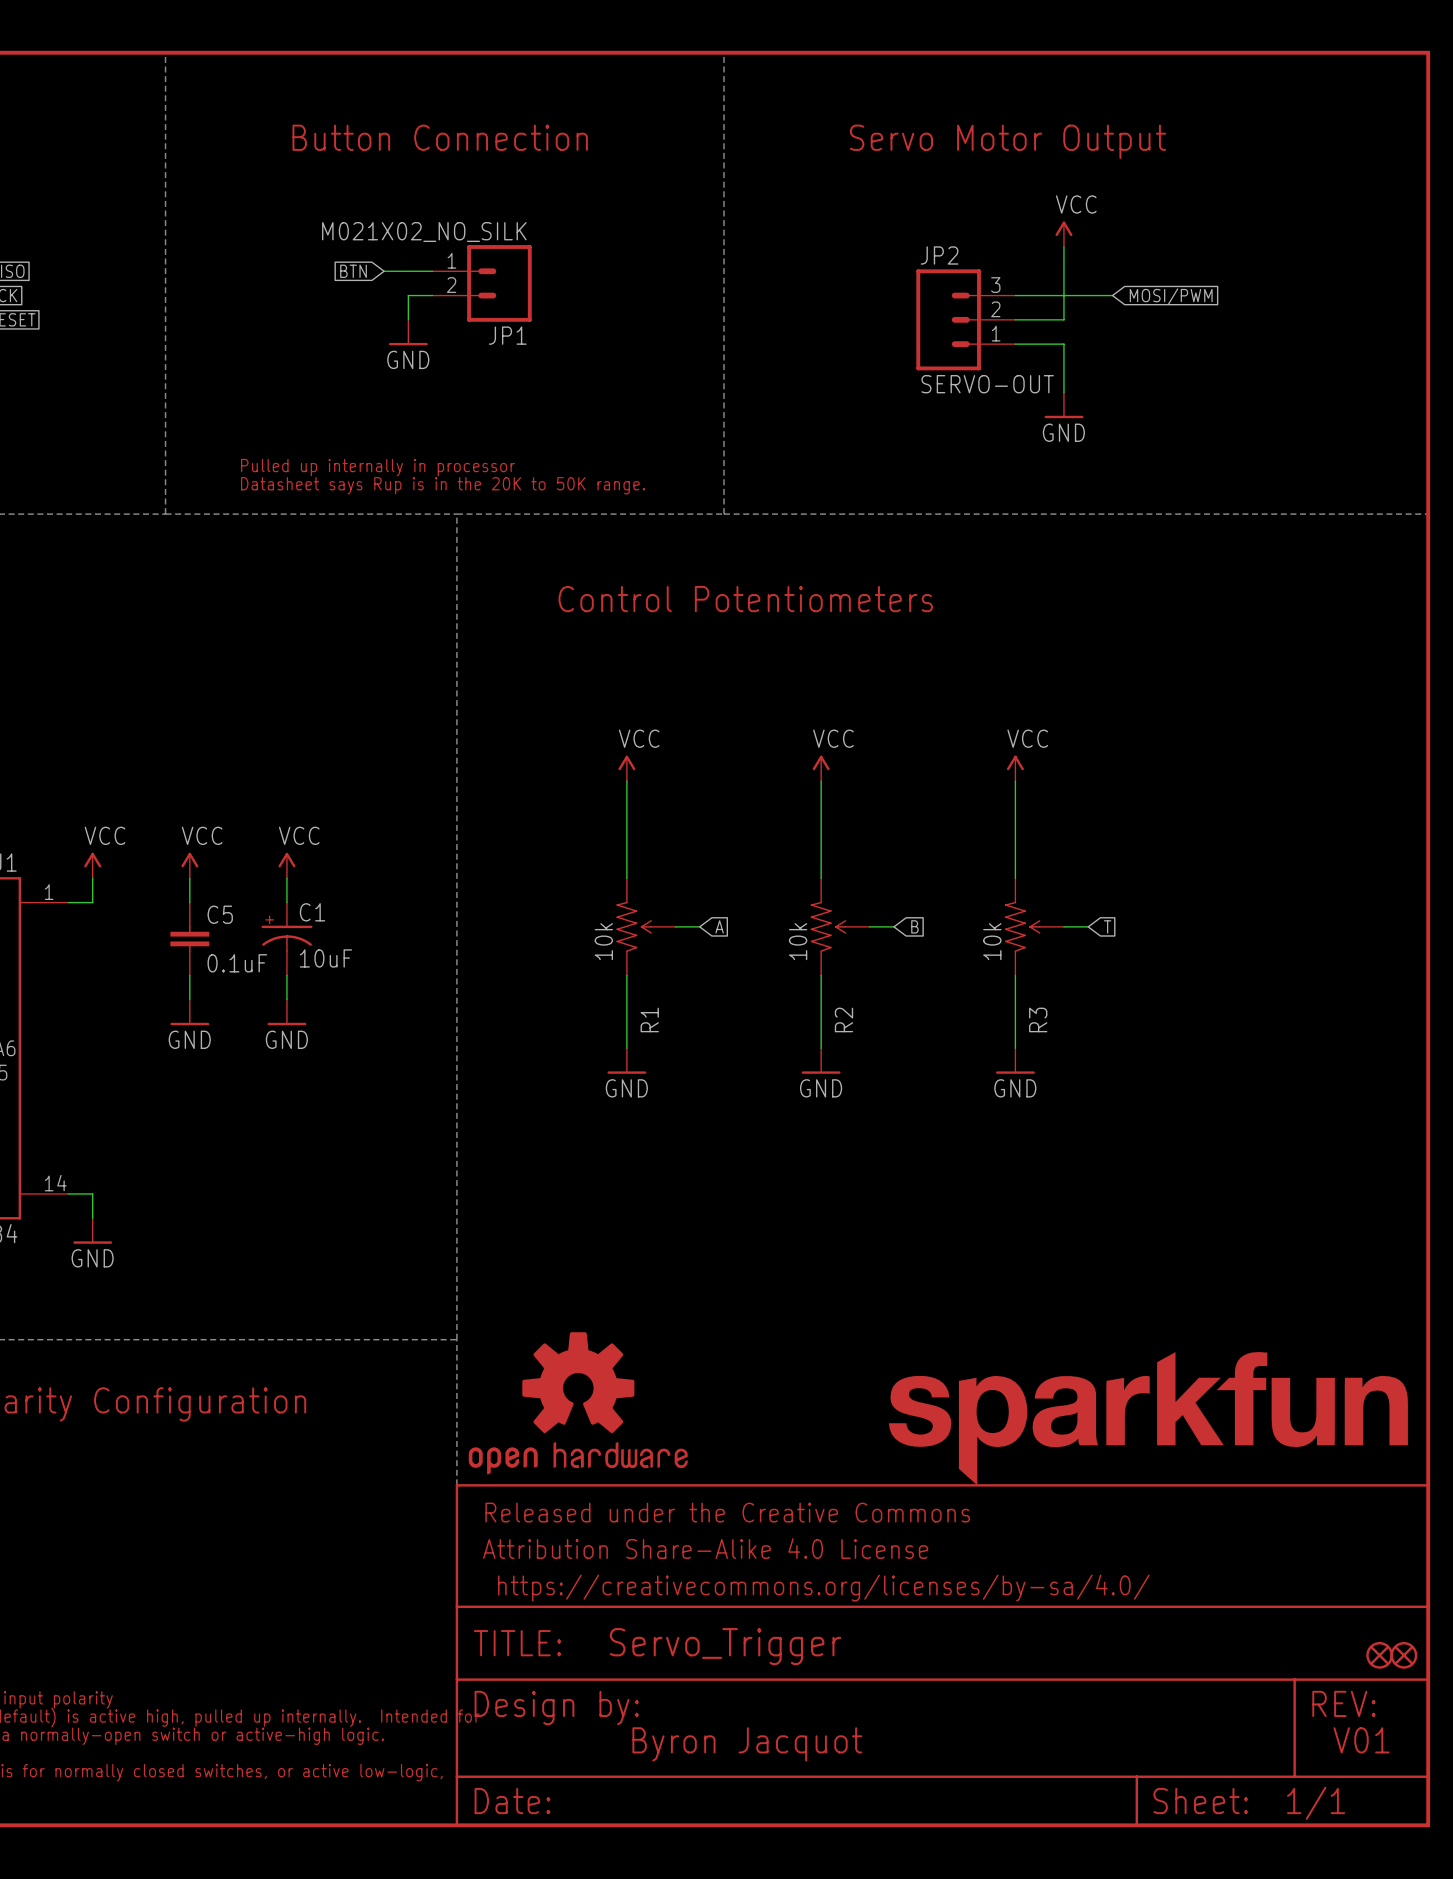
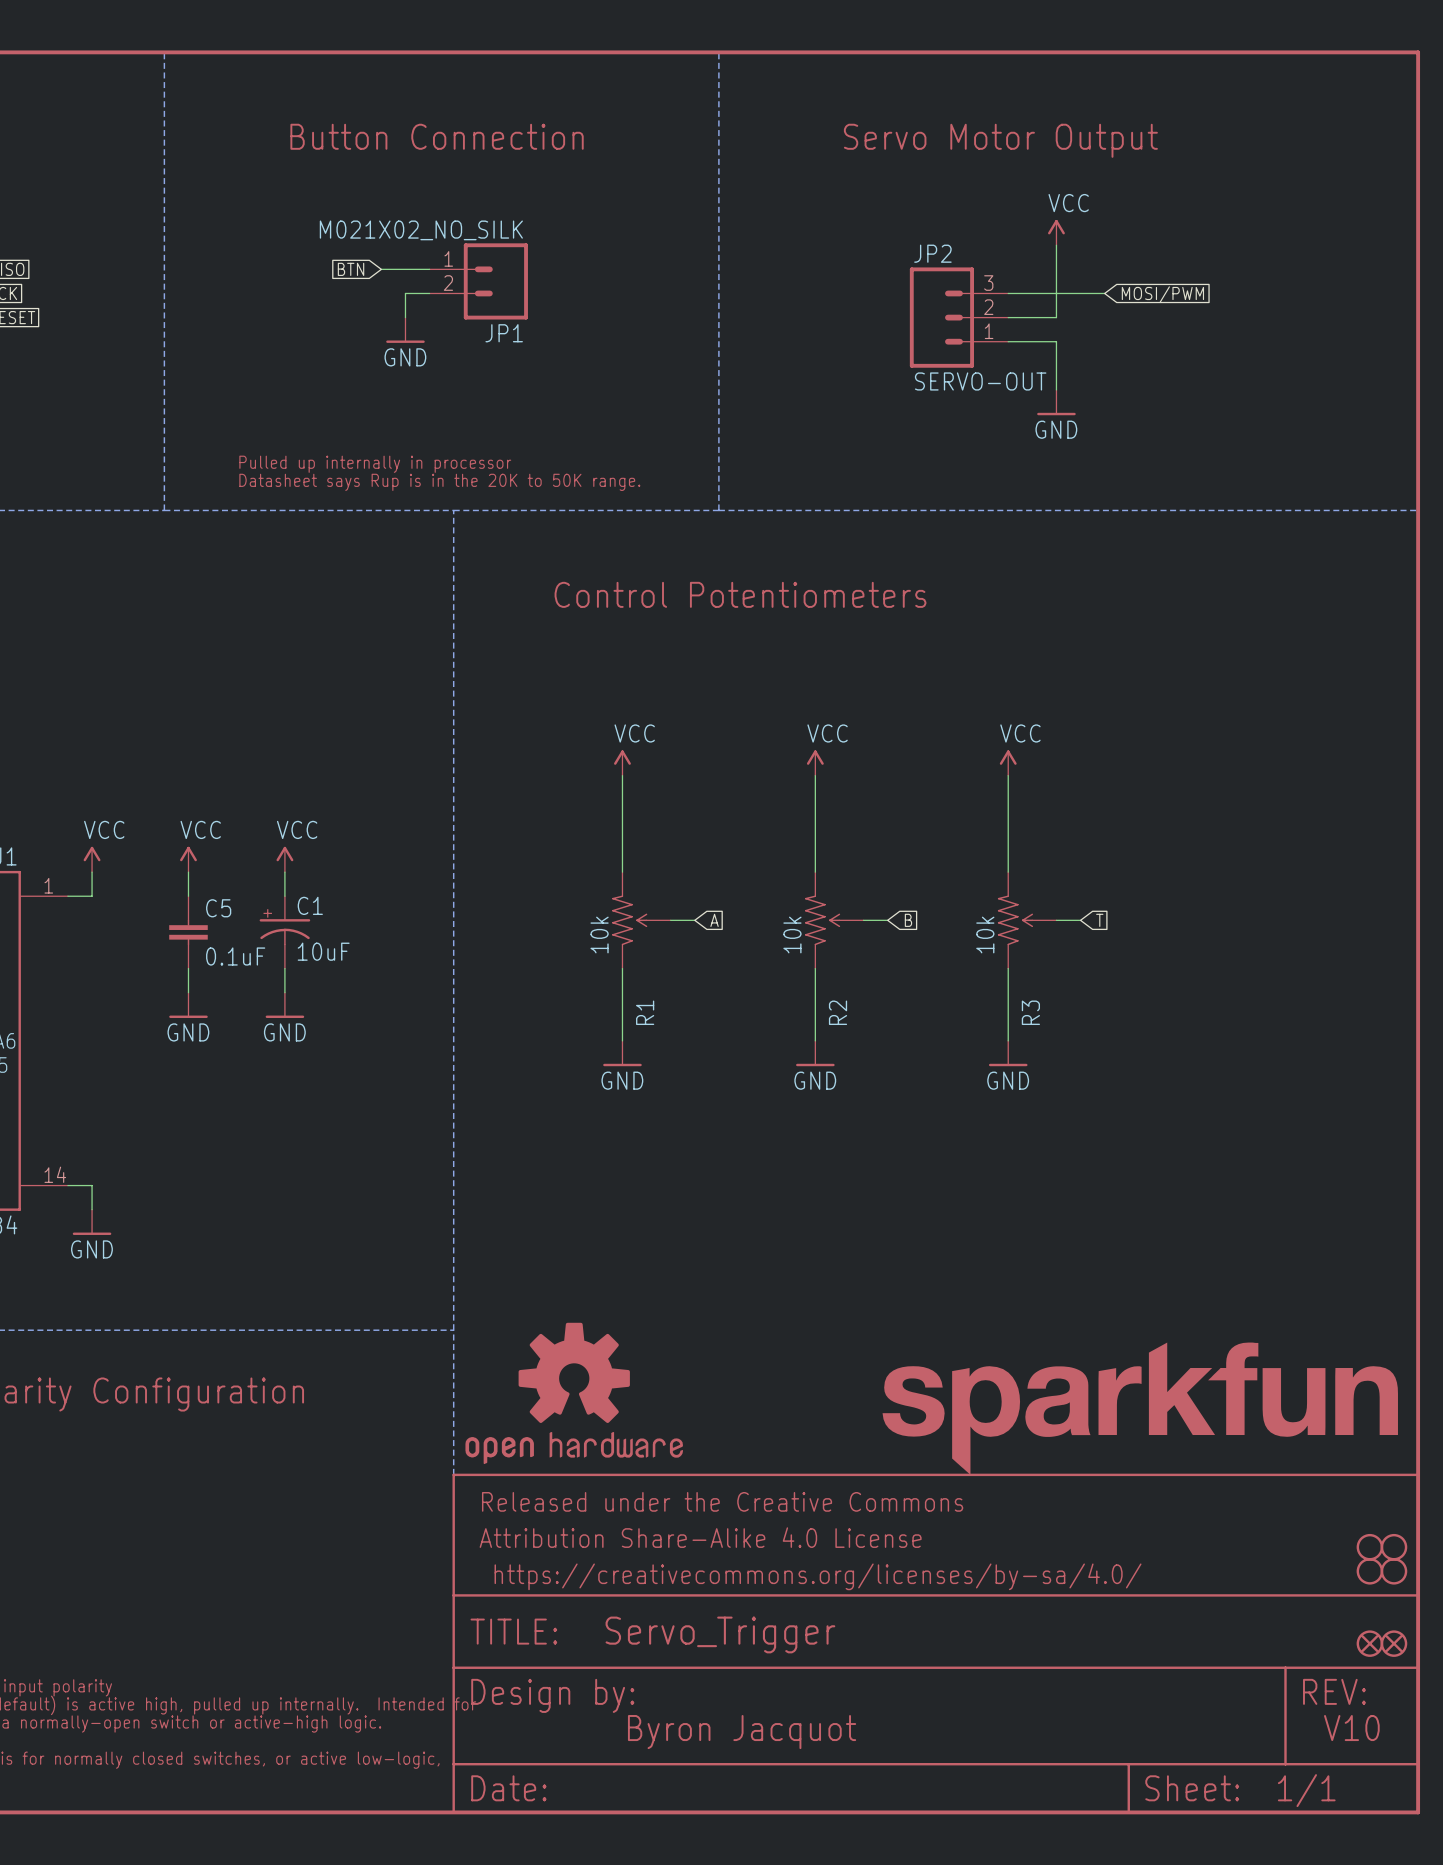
part: none -> (1369, 1547)
part: none -> (1393, 1547)
part: none -> (1369, 1571)
part: none -> (1393, 1571)
text: V01 (1361, 1740) -> V10 (1351, 1728)

